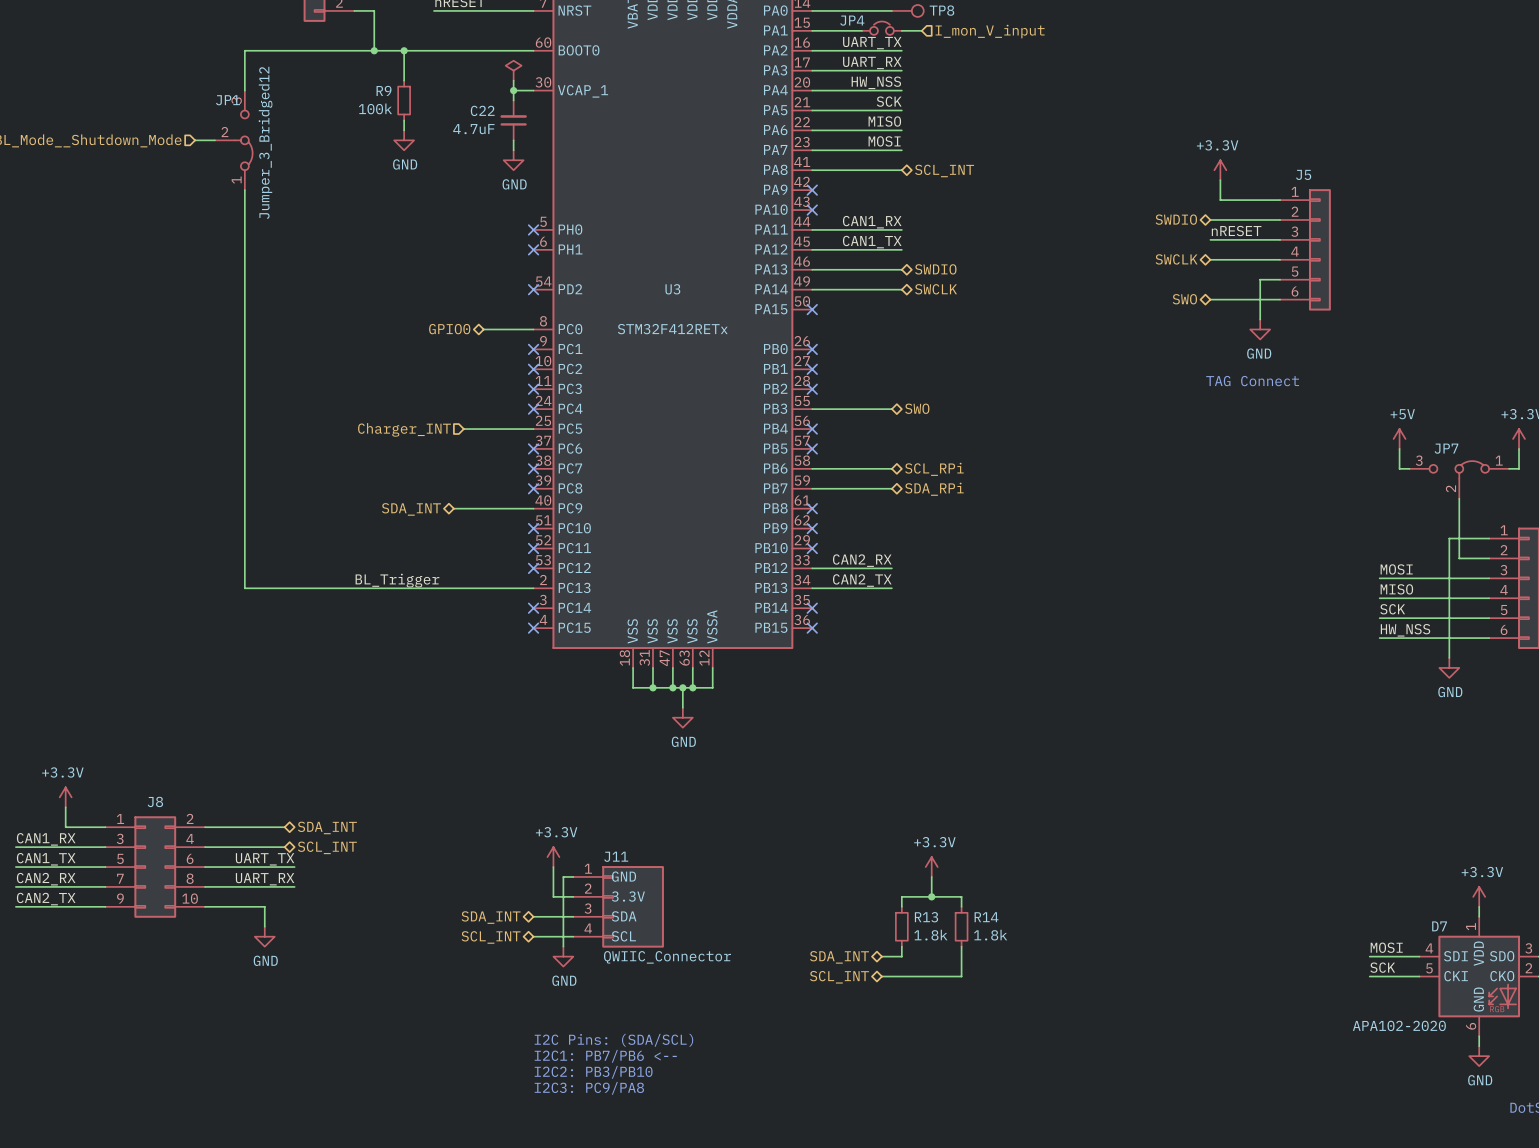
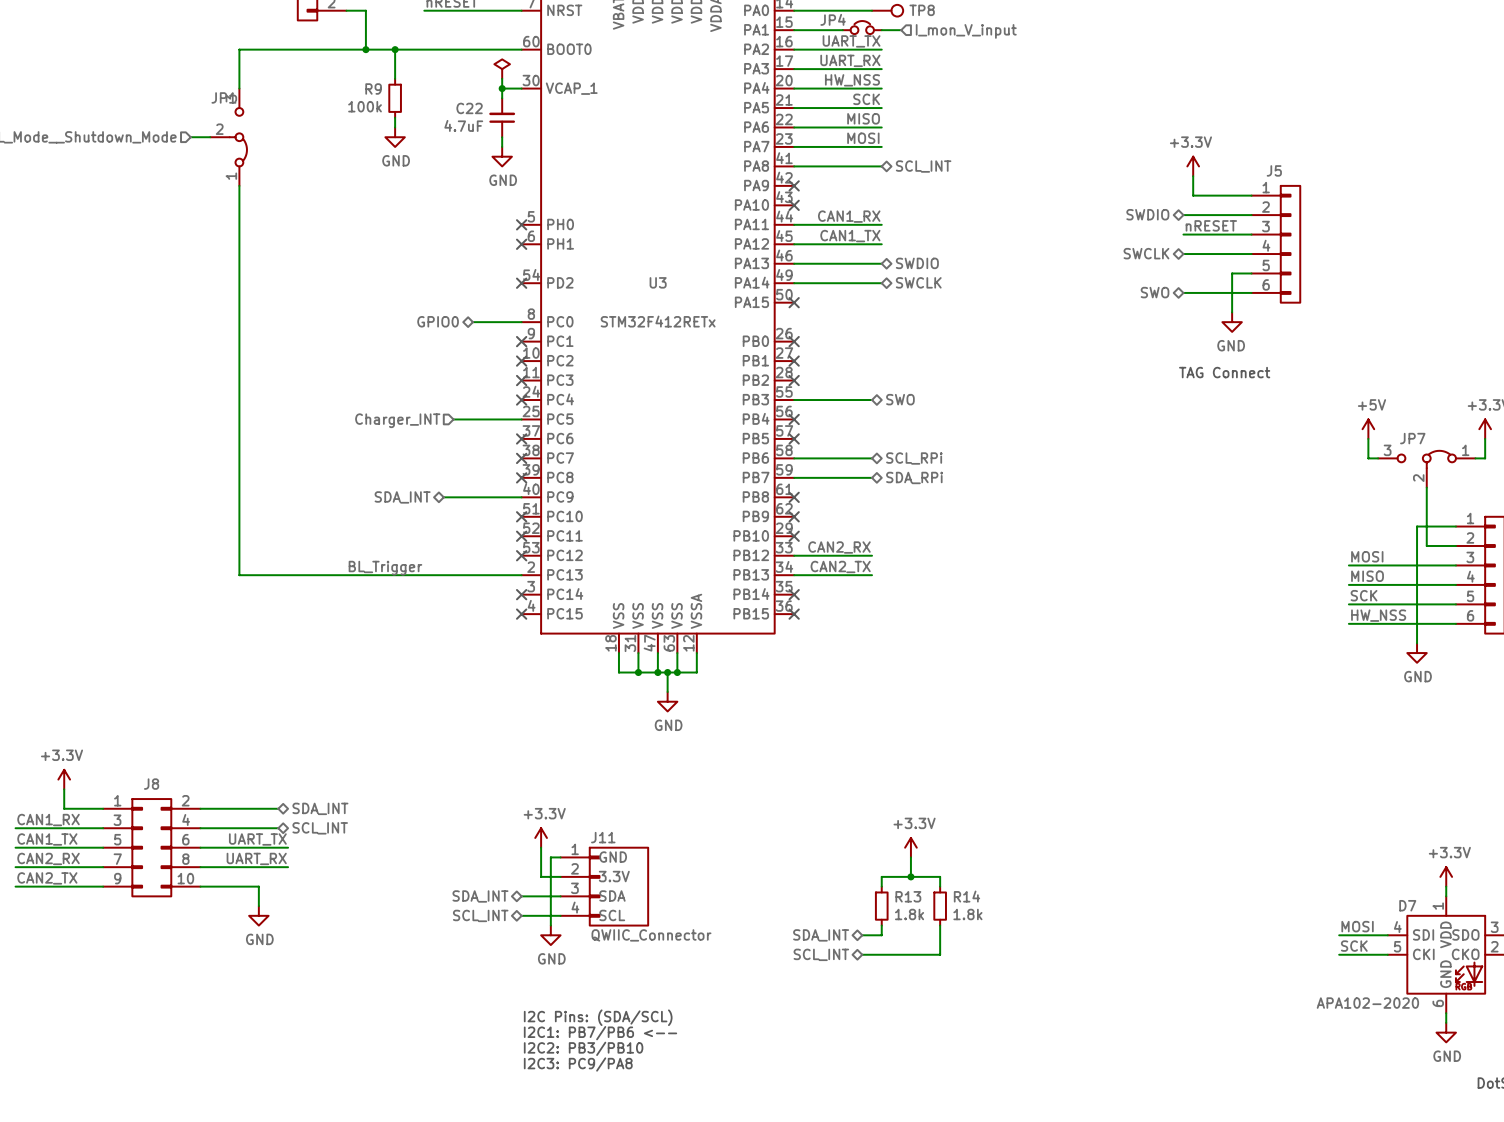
JP1 value: Jumper_3_Bridged12 (265, 142) -> none

